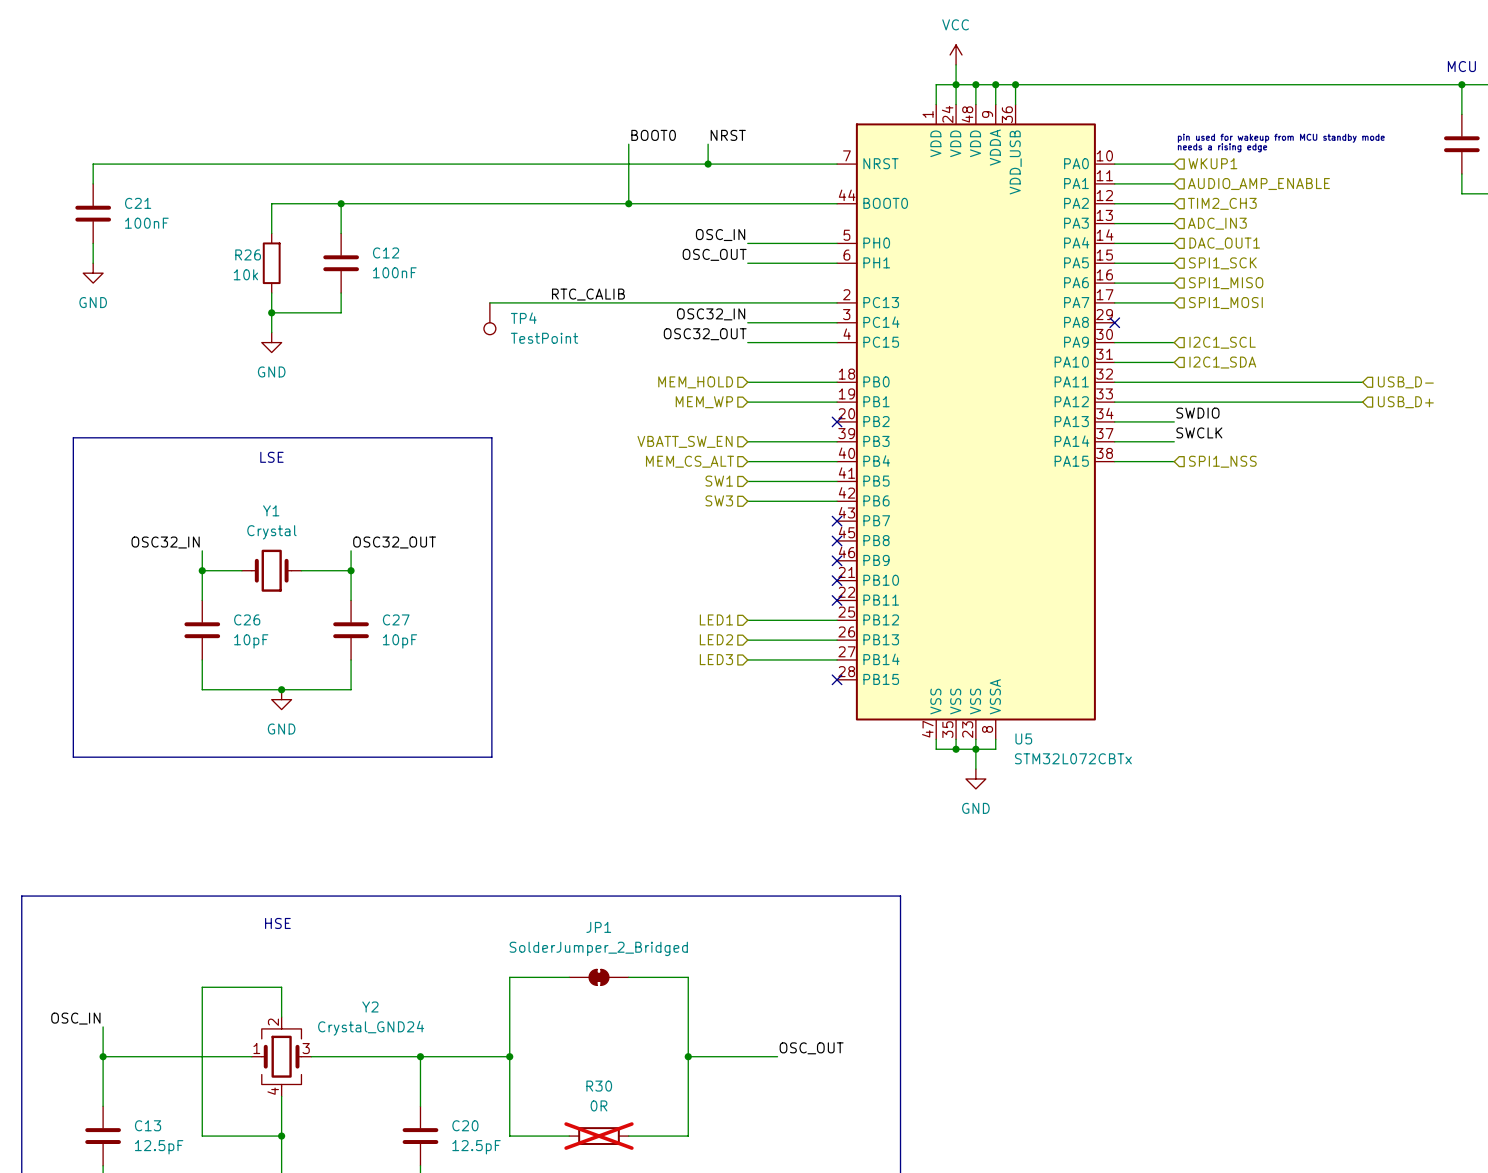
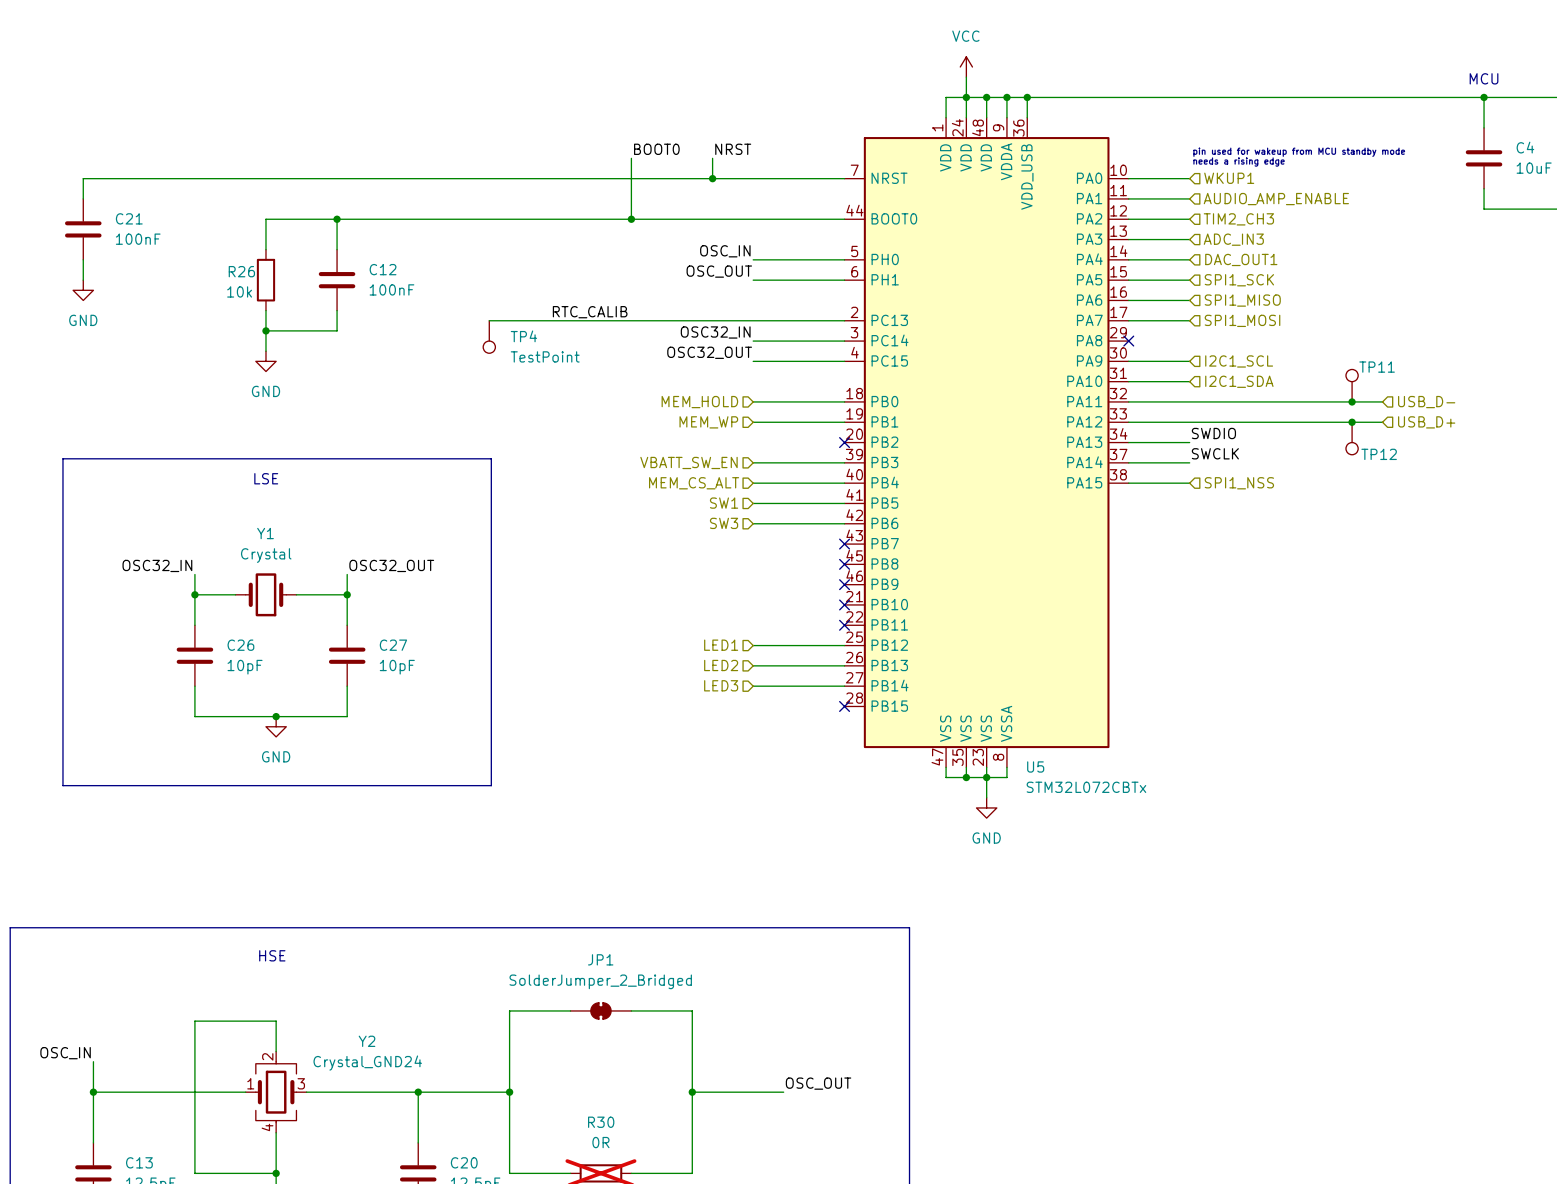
TP11: none -> (1352, 385)
junction: none -> (1352, 401)
junction: none -> (1352, 422)
TP12: none -> (1352, 438)

